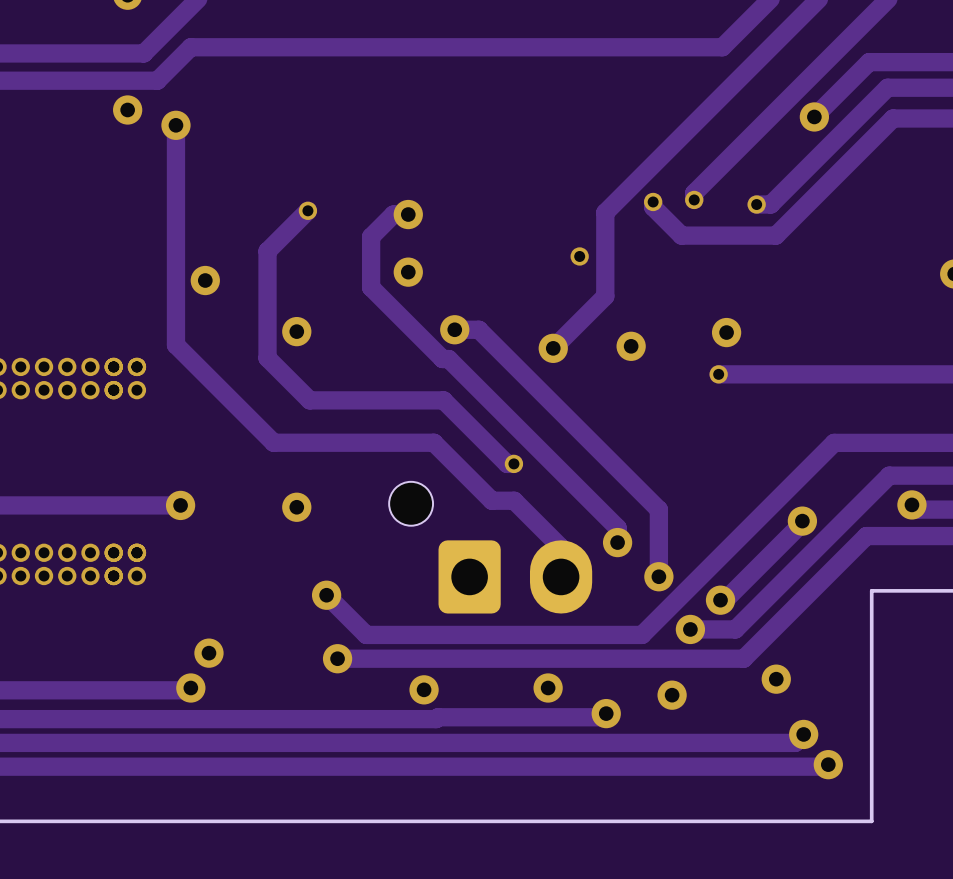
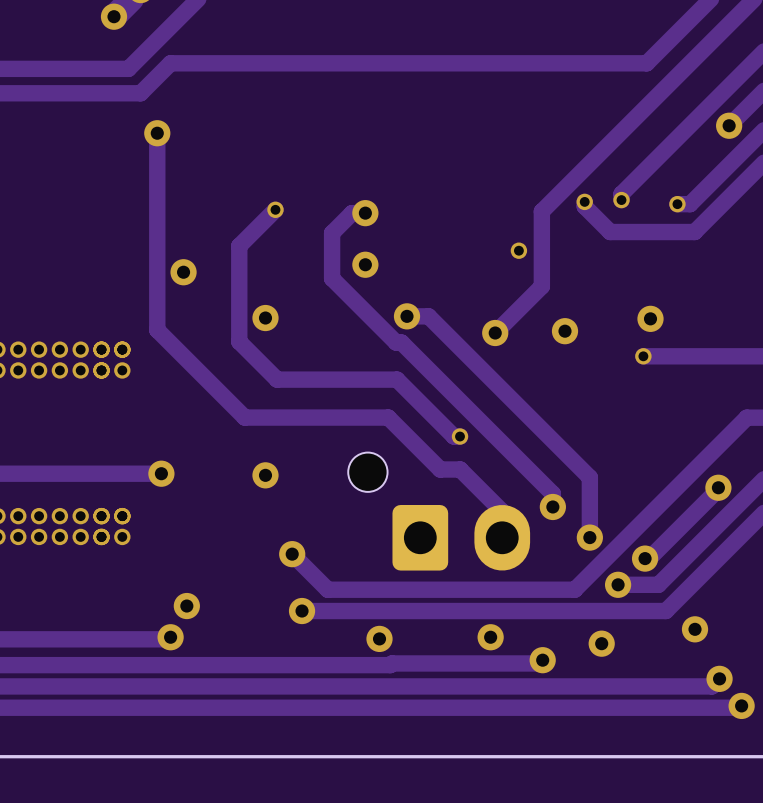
via: (127, 109) -> none

